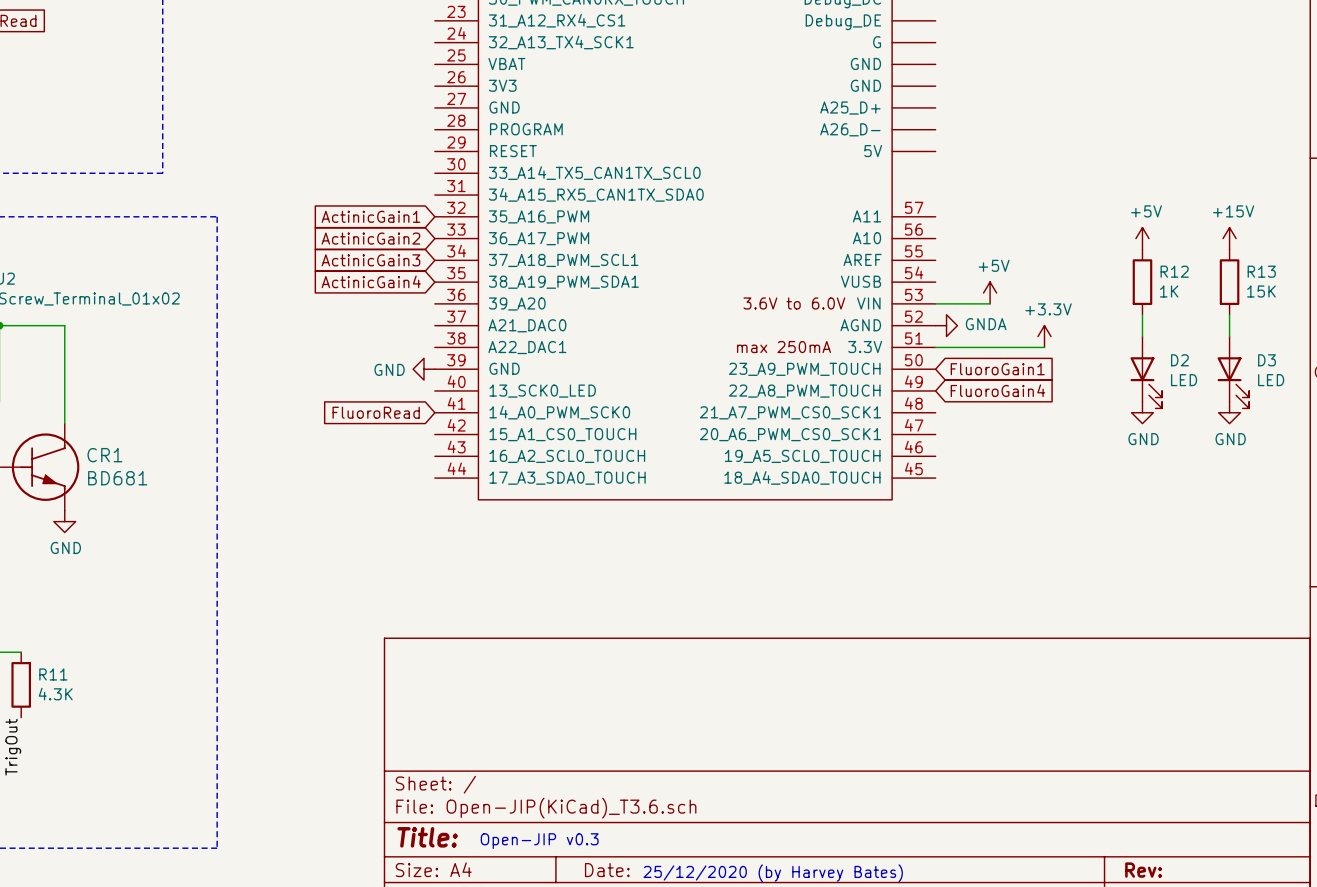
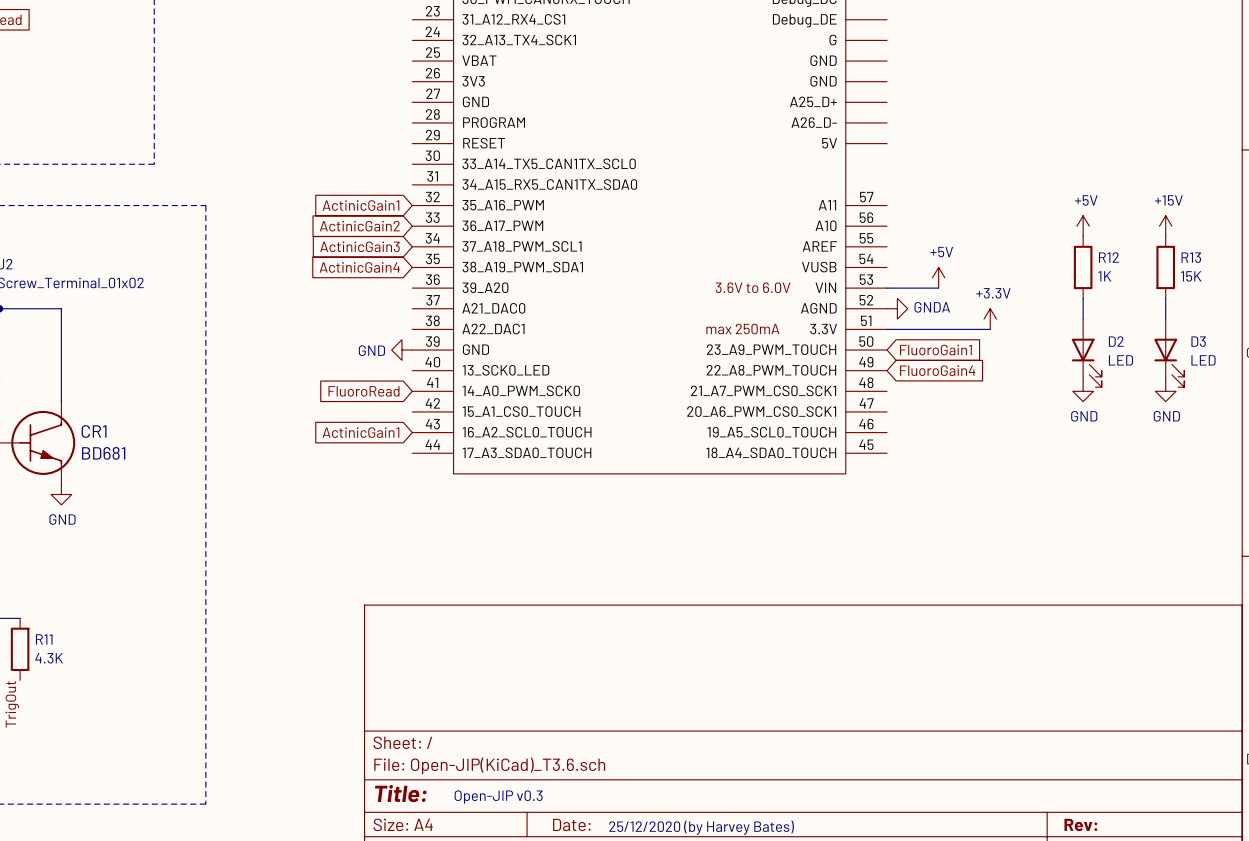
global label: none -> ActinicGain1 (360, 432)

